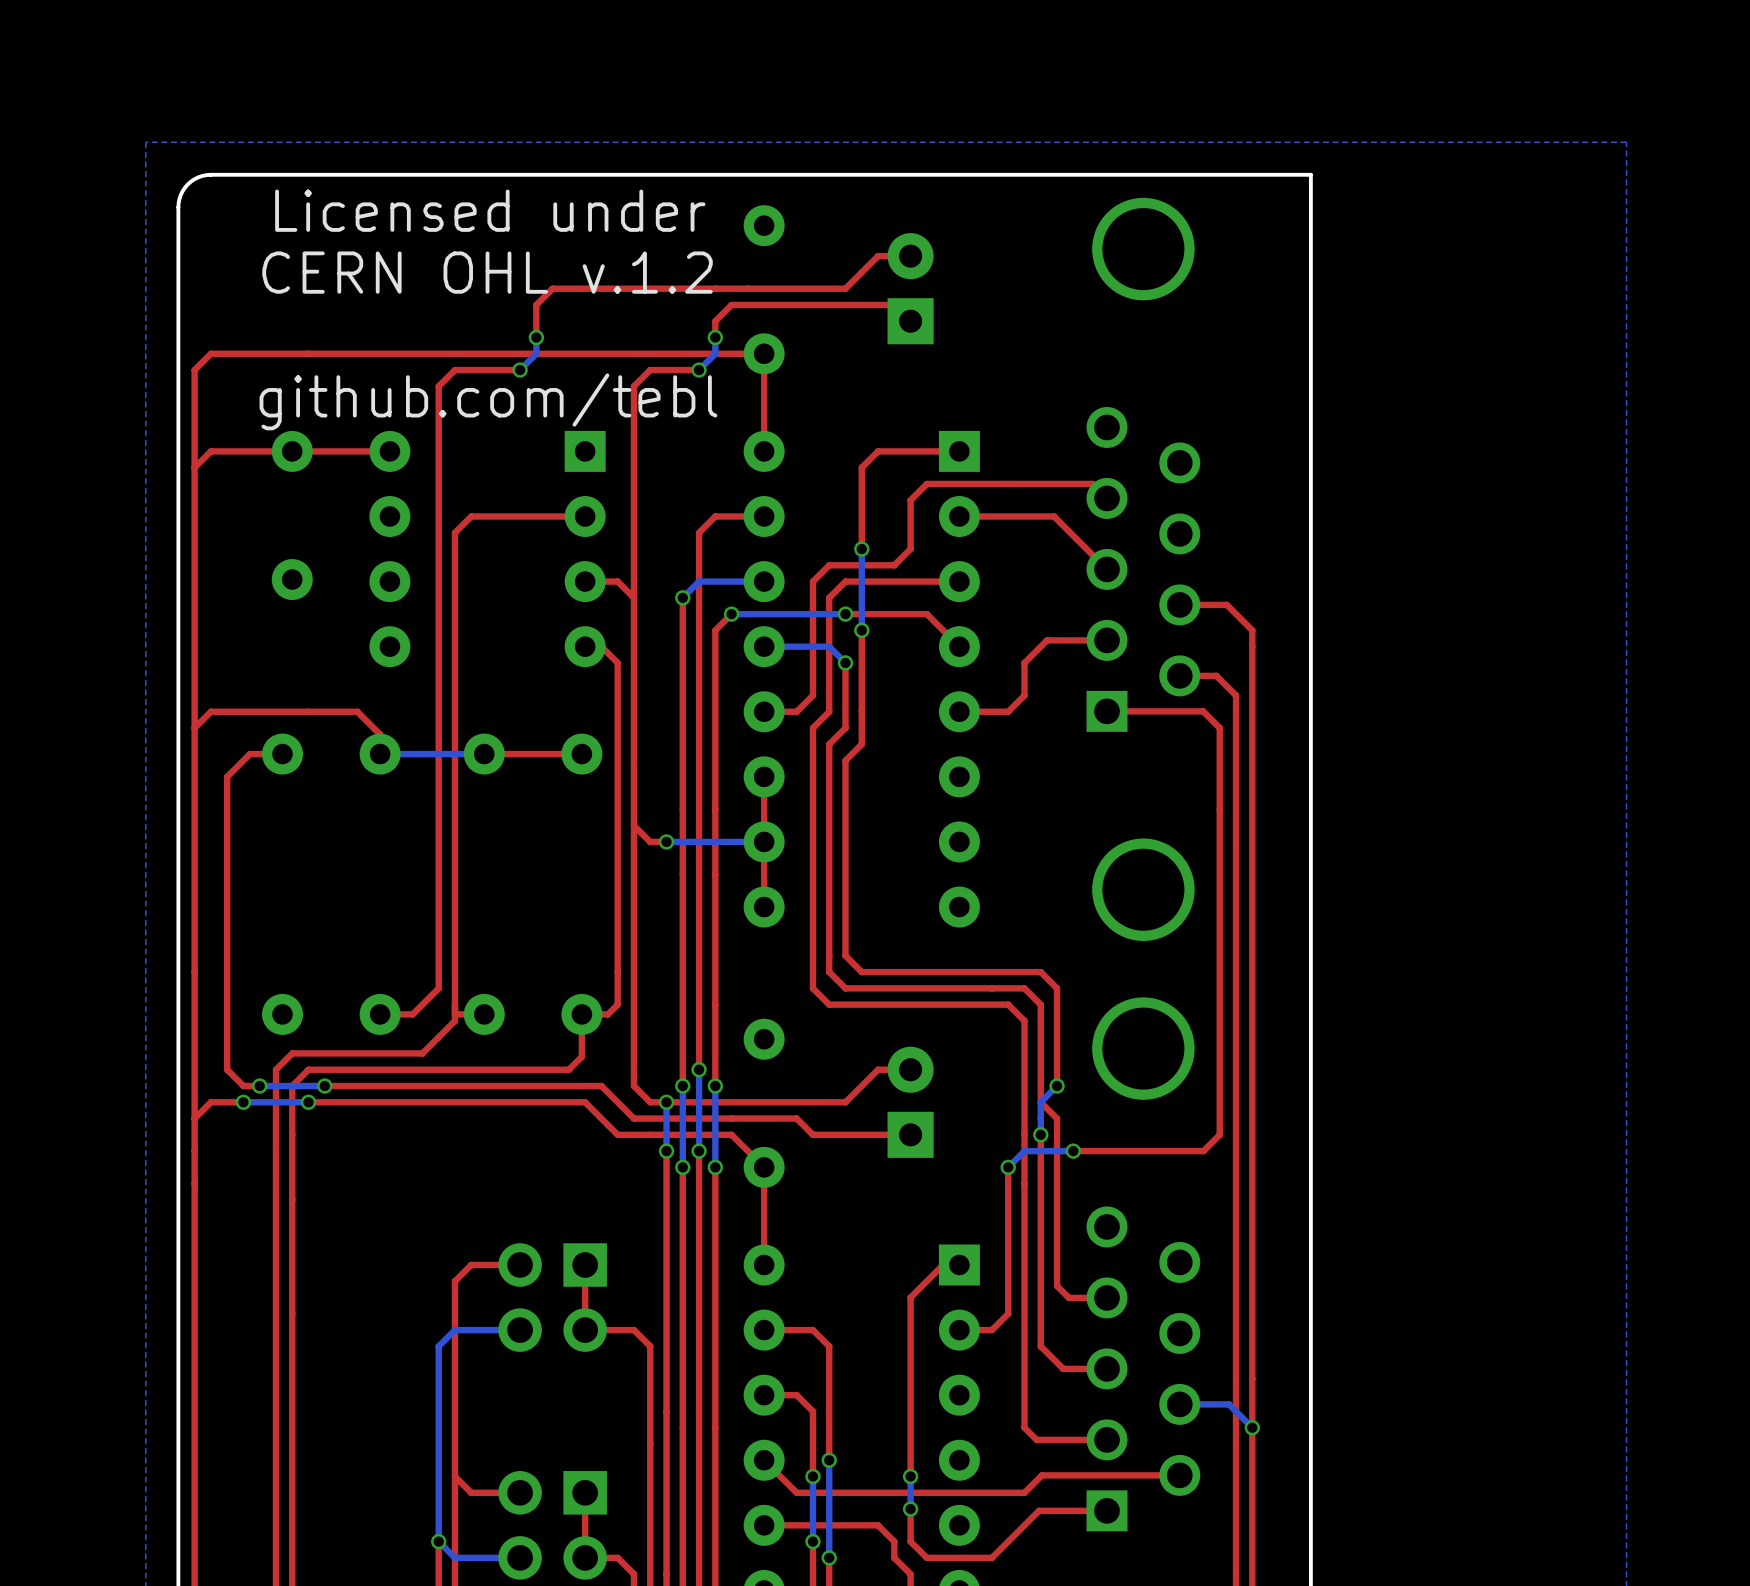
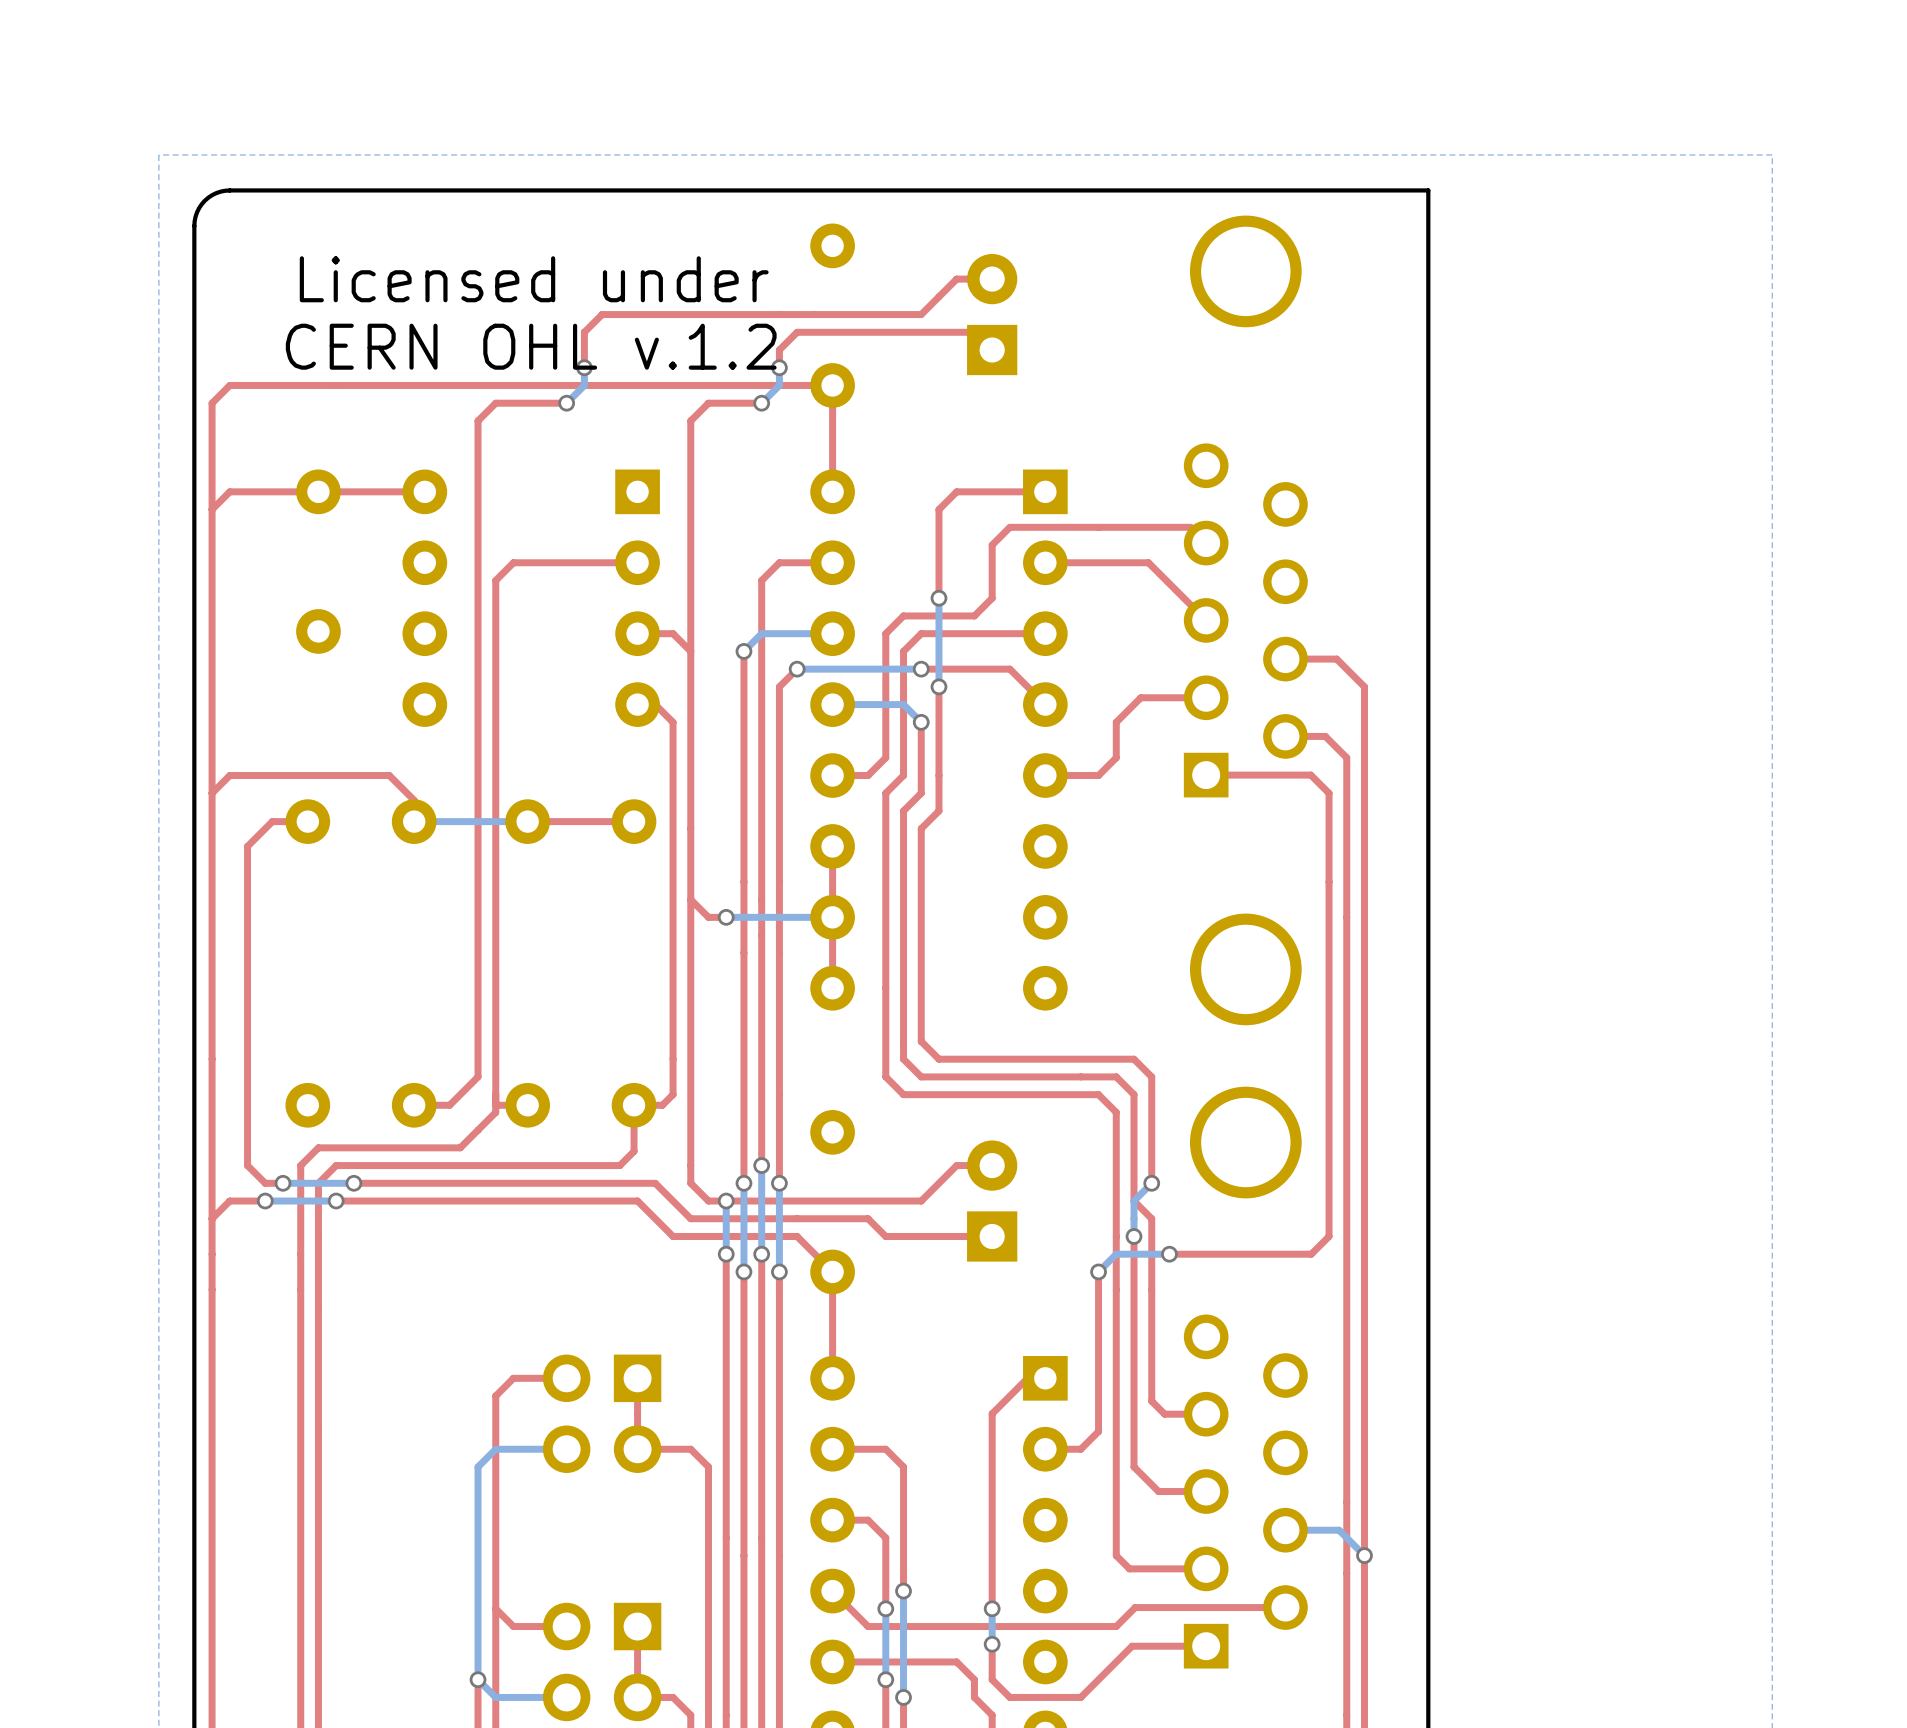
text: Licensed under (490, 210) -> none
text: CERN OHL v.1.2 (487, 272) -> Licensed under (534, 279)
text: none -> CERN OHL v.1.2 (531, 346)
text: github.com/tebl (488, 401) -> none

